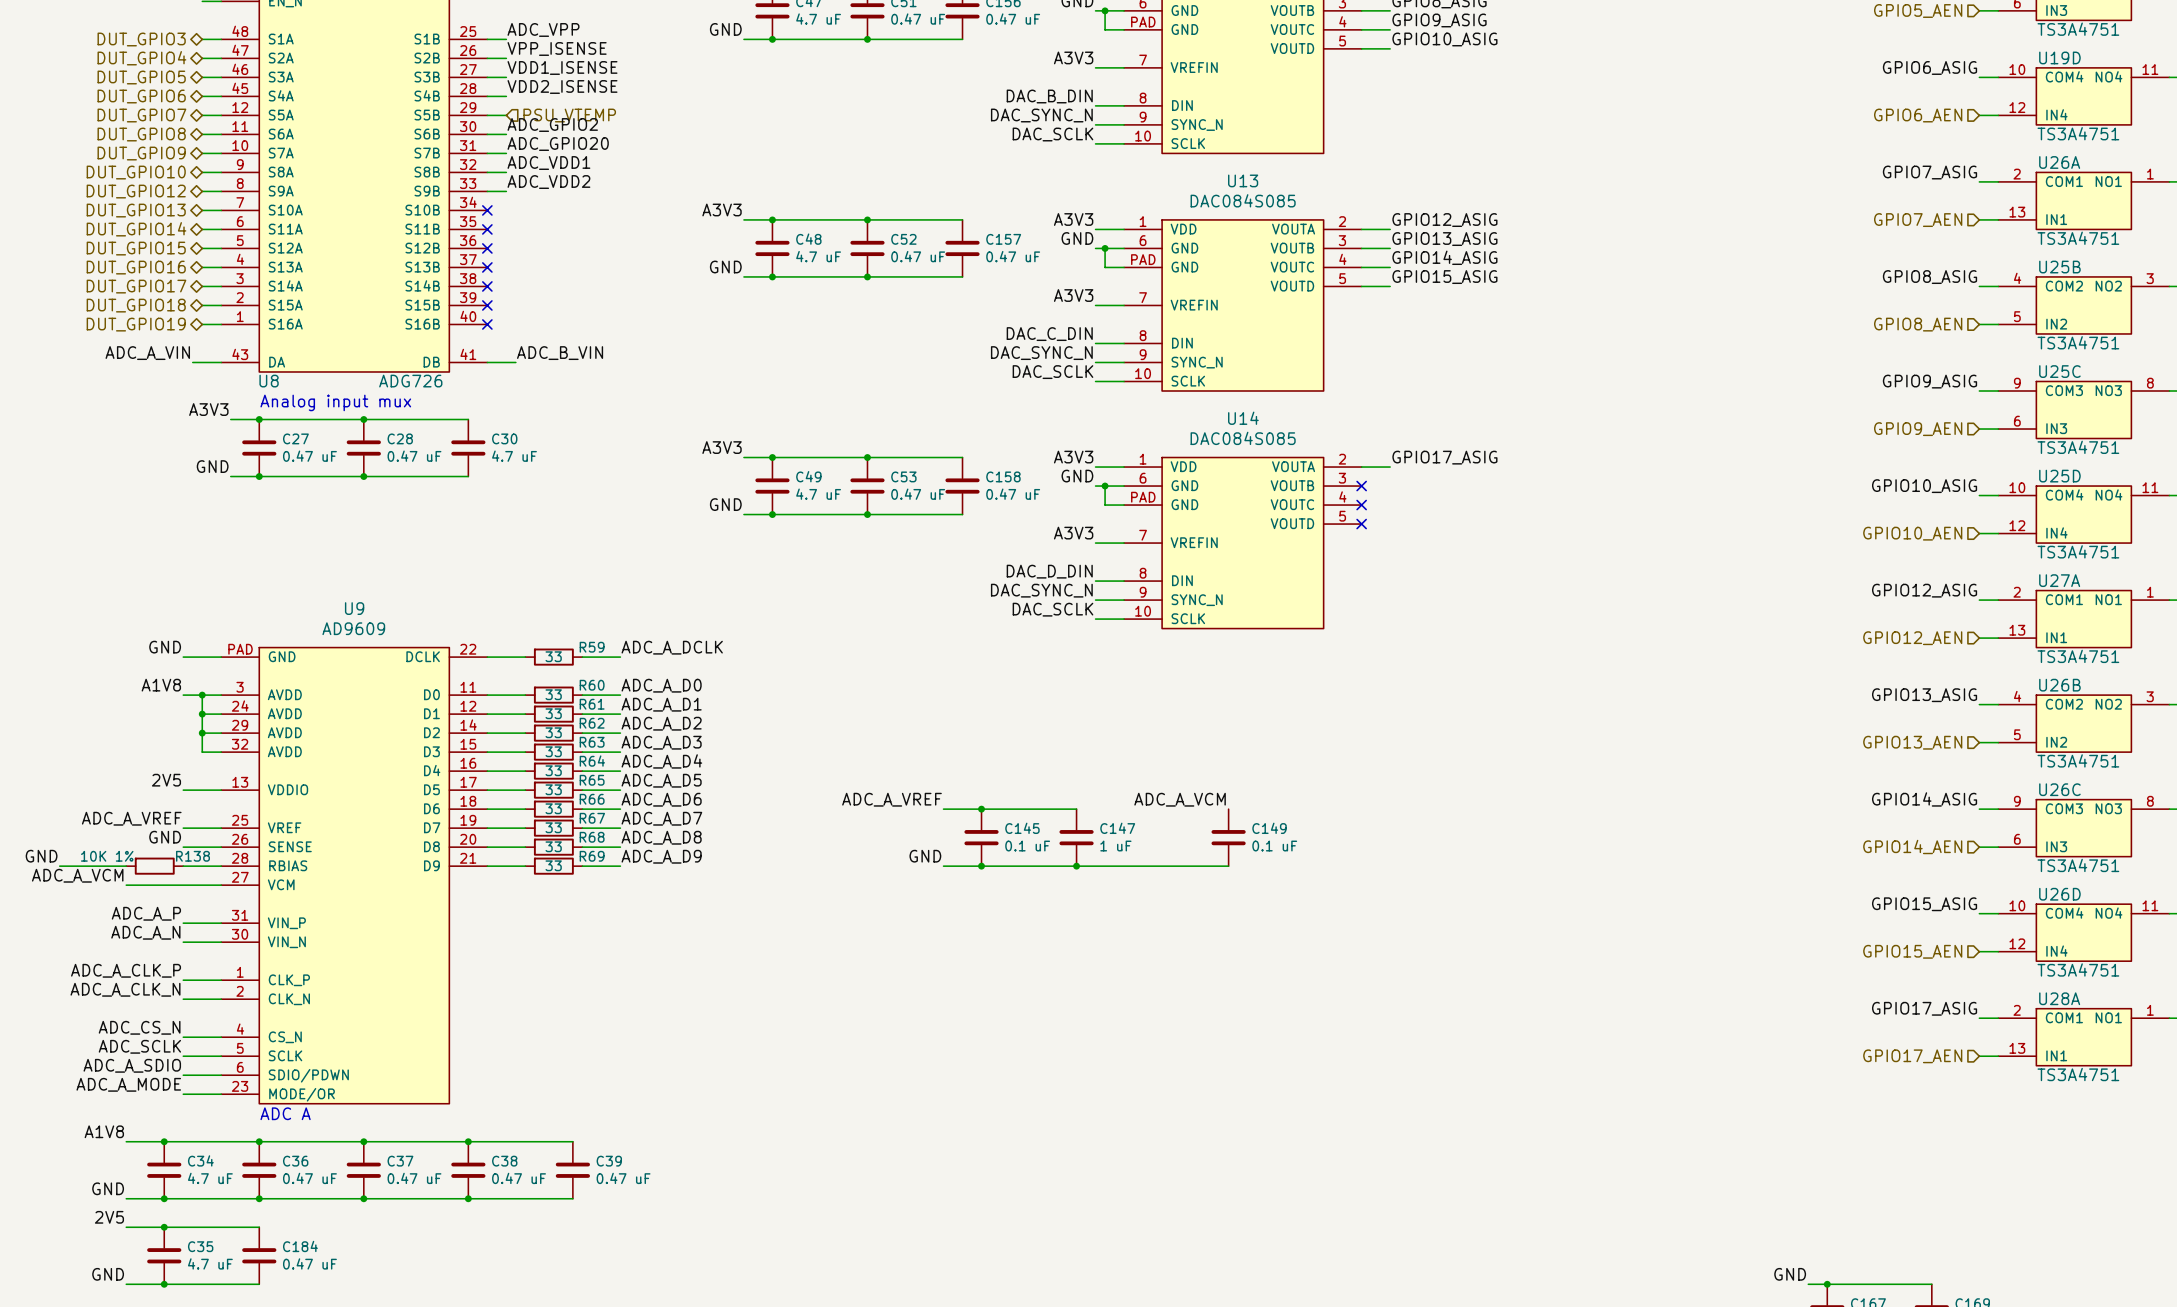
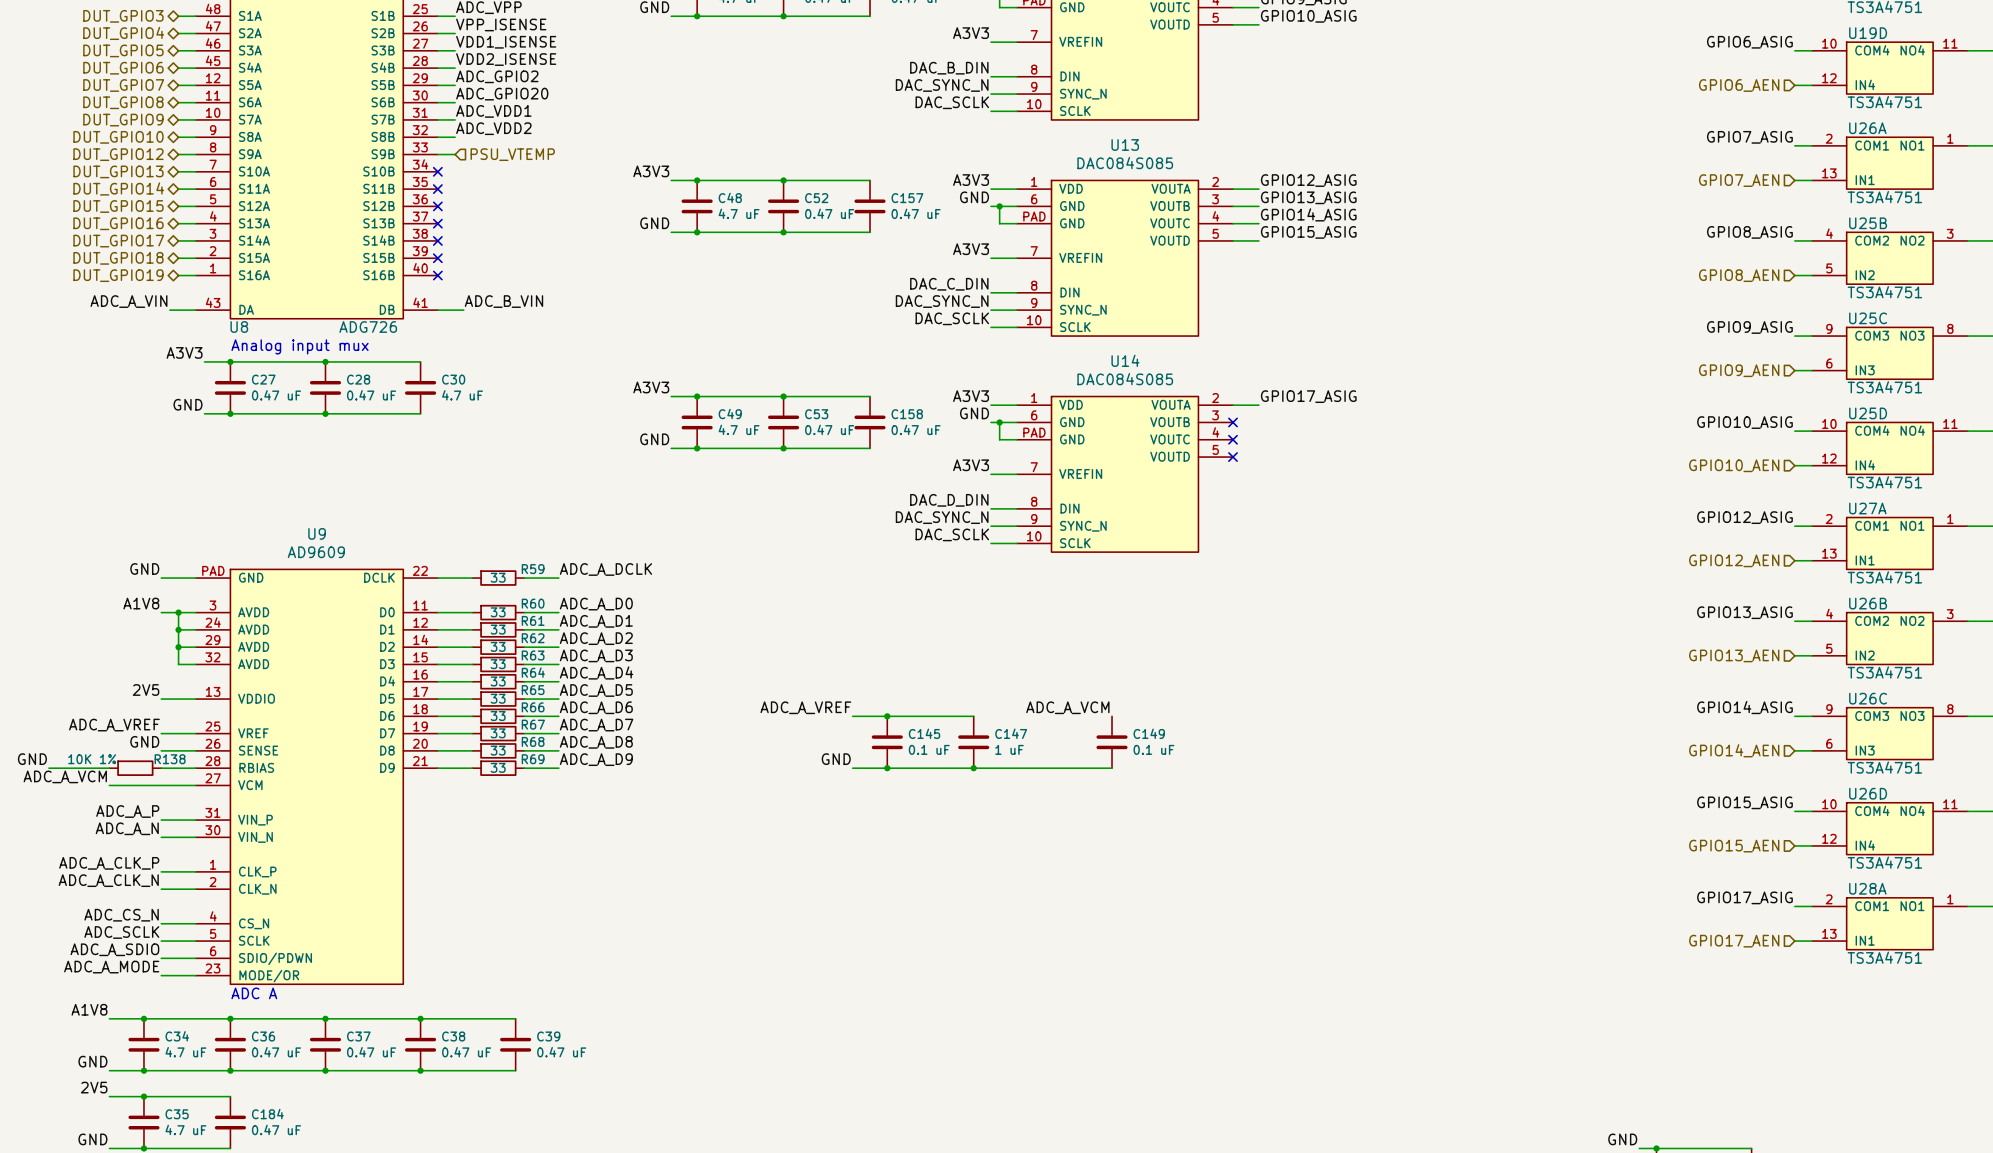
label: none -> ADC_GPIO2 (497, 76)
hierarchical label position: PSU_VTEMP (569, 115) -> PSU_VTEMP (512, 154)
label: ADC_GPIO2 (552, 125) -> ADC_GPIO20 (502, 94)
label: ADC_GPIO20 (558, 144) -> ADC_VDD1 (493, 111)
label: ADC_VDD1 (548, 163) -> ADC_VDD2 (493, 128)
label: ADC_VDD2 (548, 182) -> none

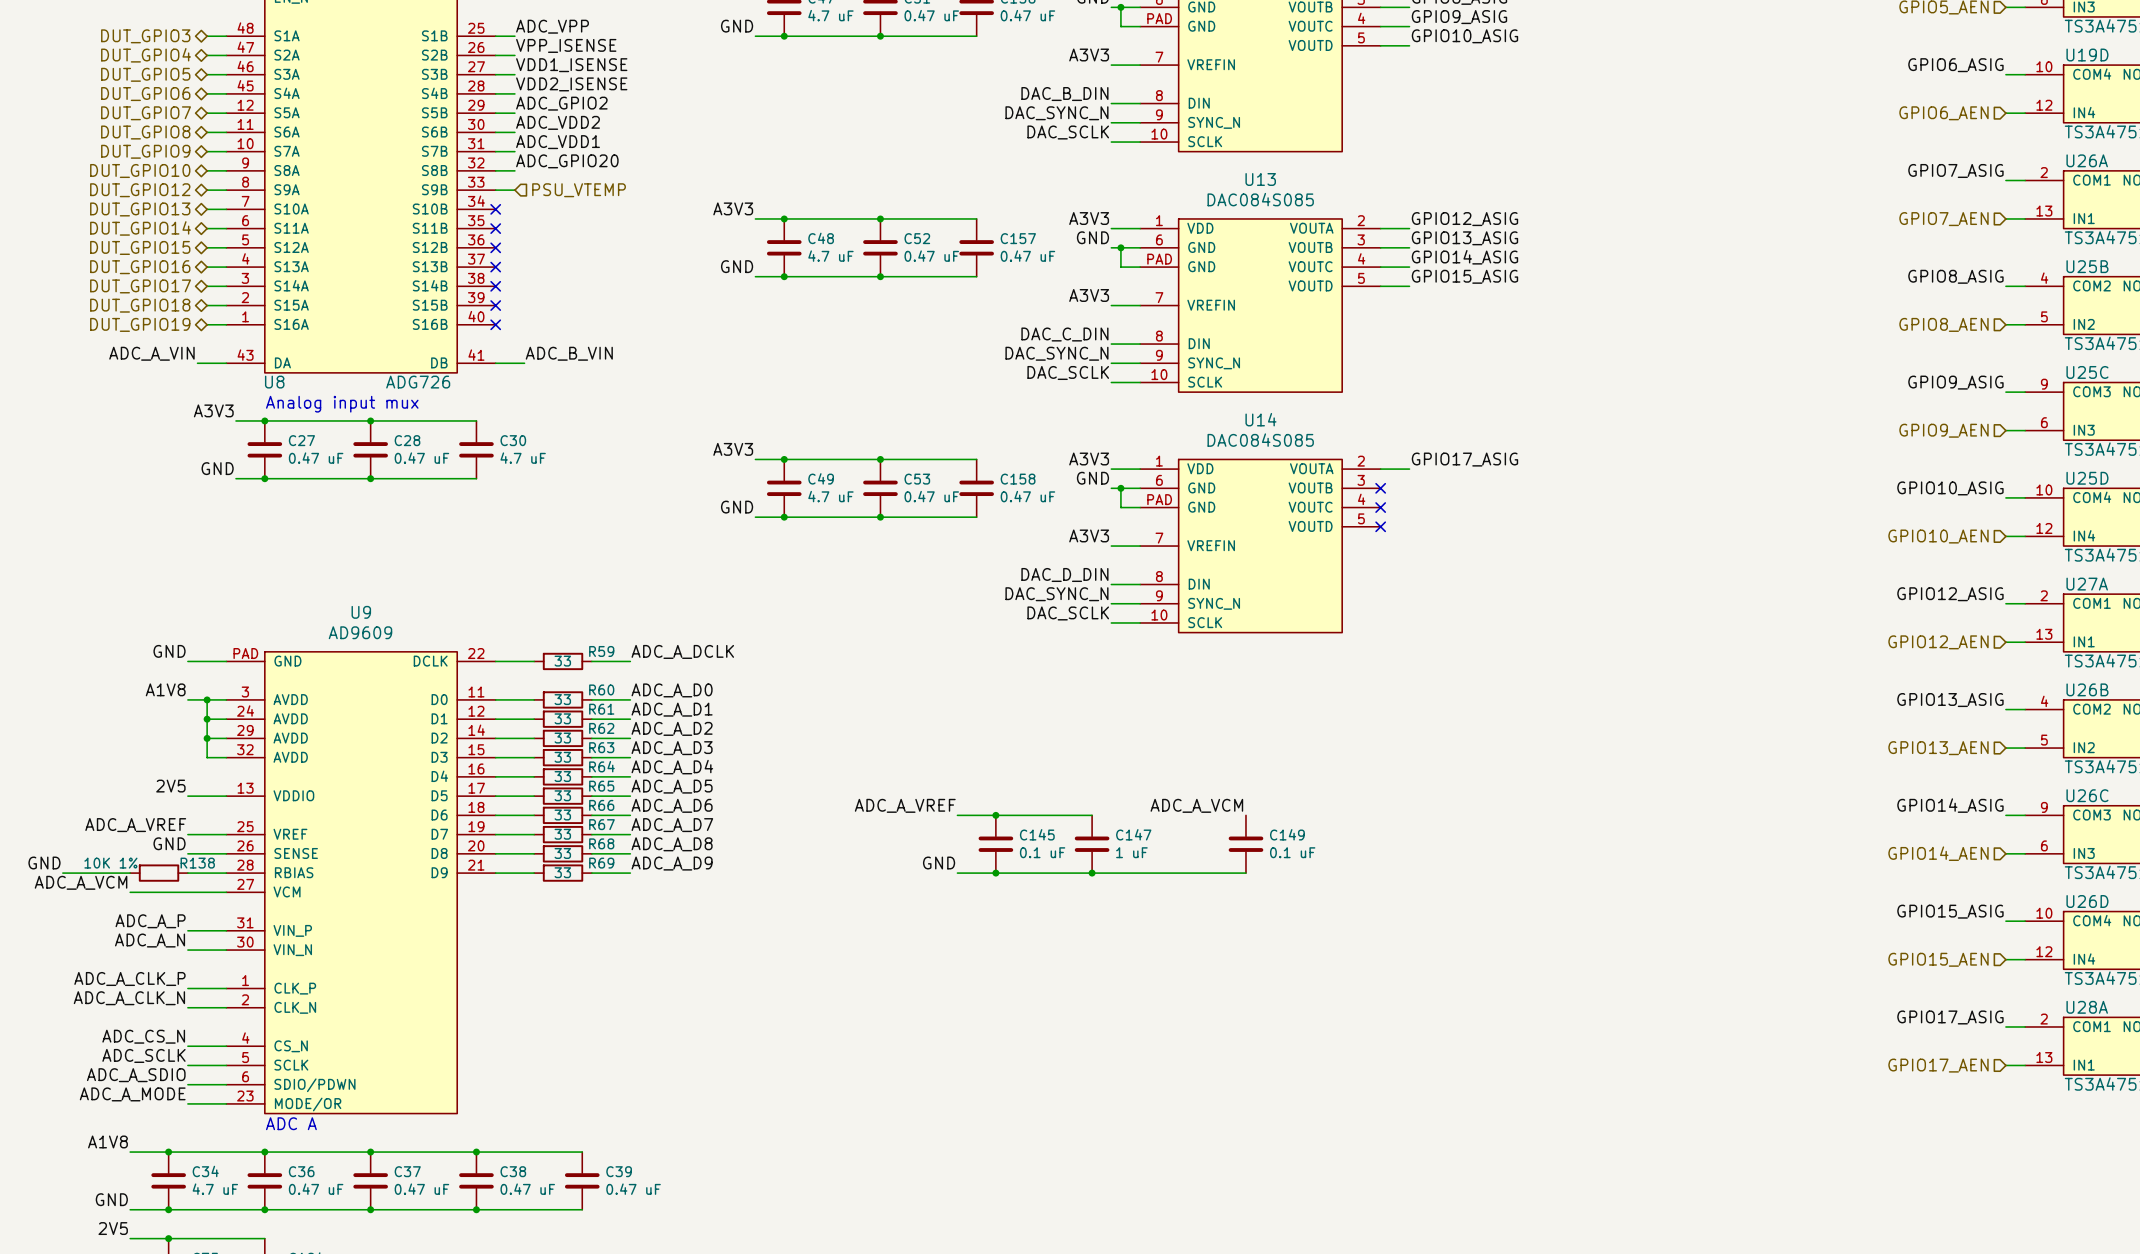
label: ADC_GPIO20 (502, 94) -> ADC_VDD2 (558, 122)
label: ADC_VDD2 (493, 128) -> ADC_GPIO20 (567, 161)

